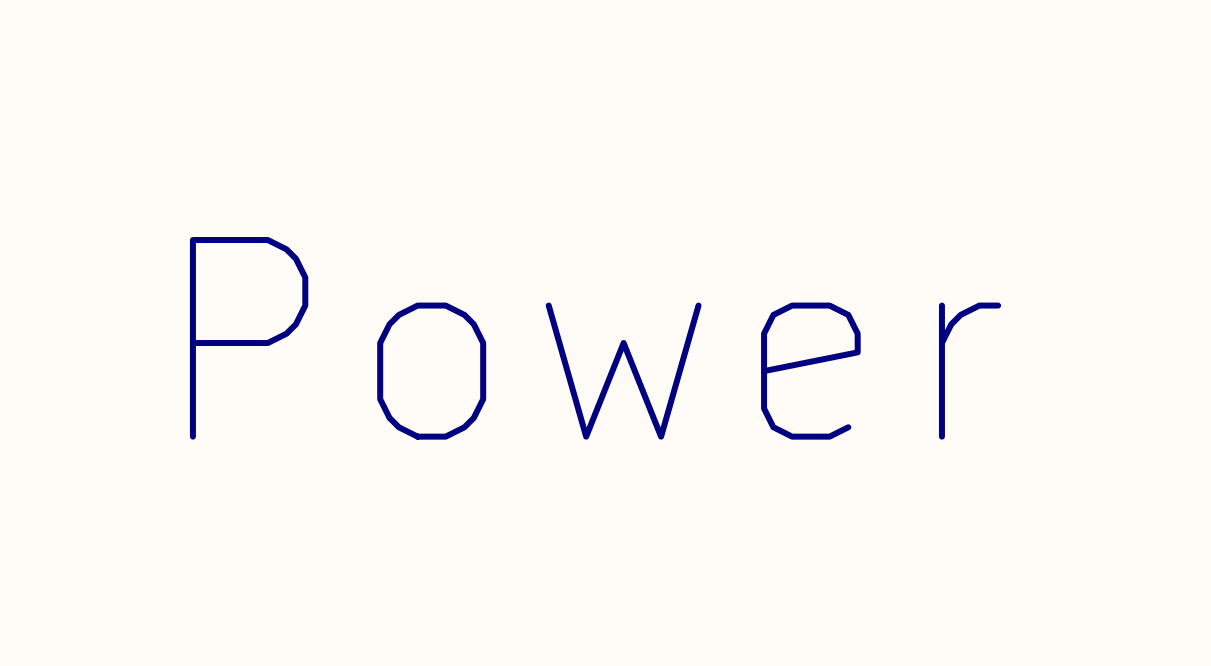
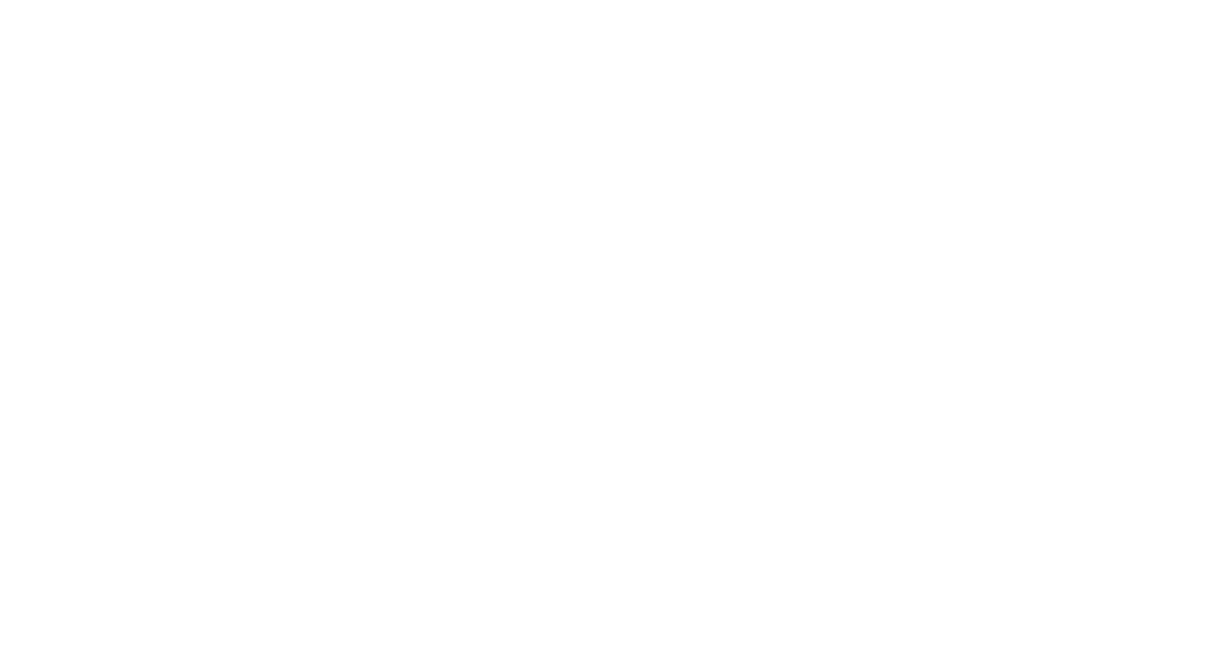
text: Power (595, 338) -> none

